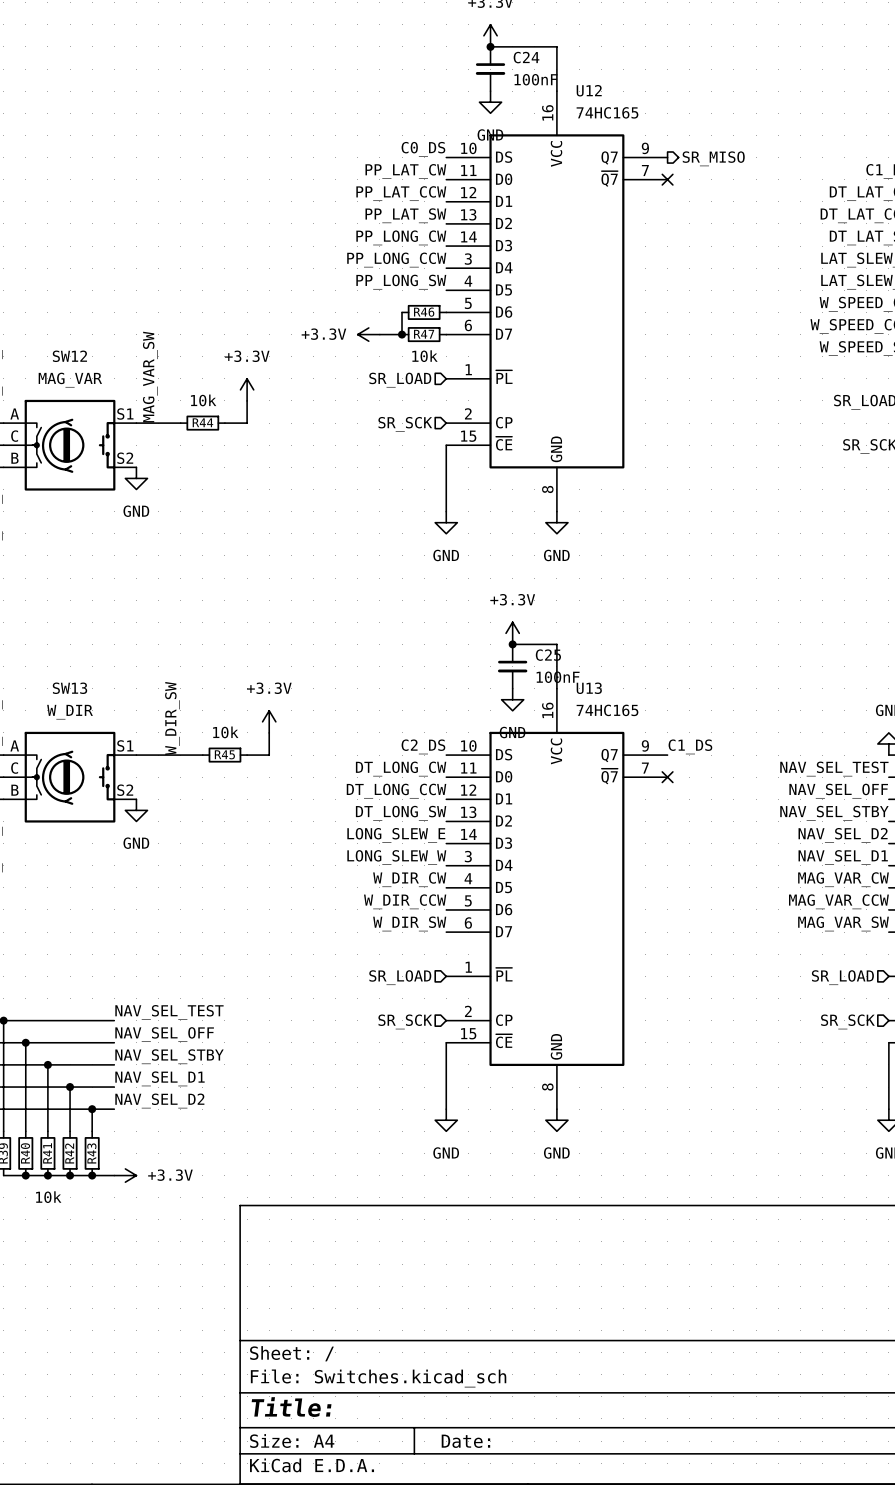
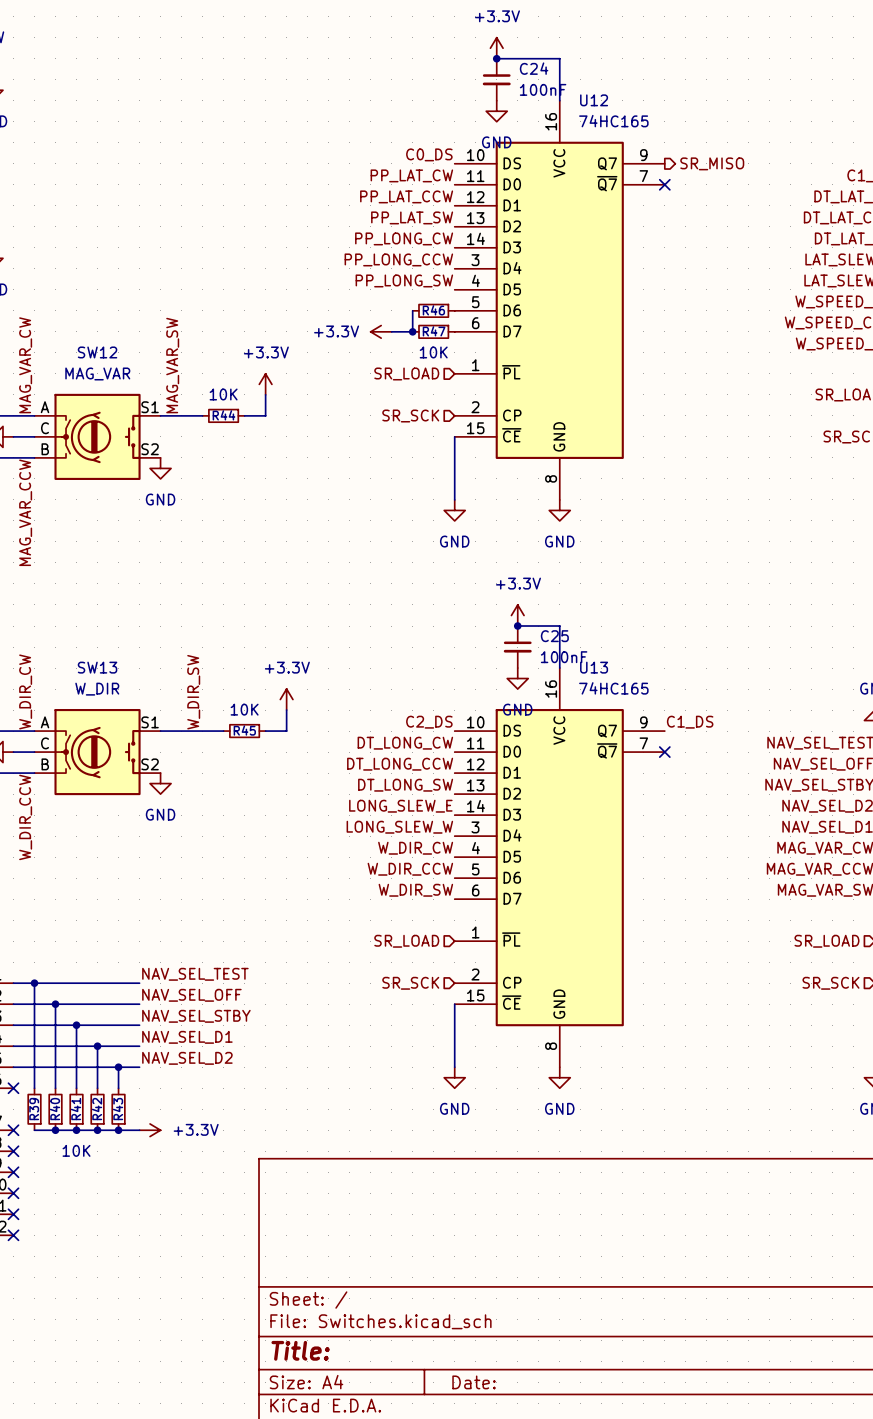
R47 value: 10k (424, 356) -> 10K (433, 352)
R44 value: 10k (203, 400) -> 10K (223, 394)
R45 value: 10k (225, 732) -> 10K (244, 709)
R43 value: 10k (48, 1197) -> 10K (76, 1150)

